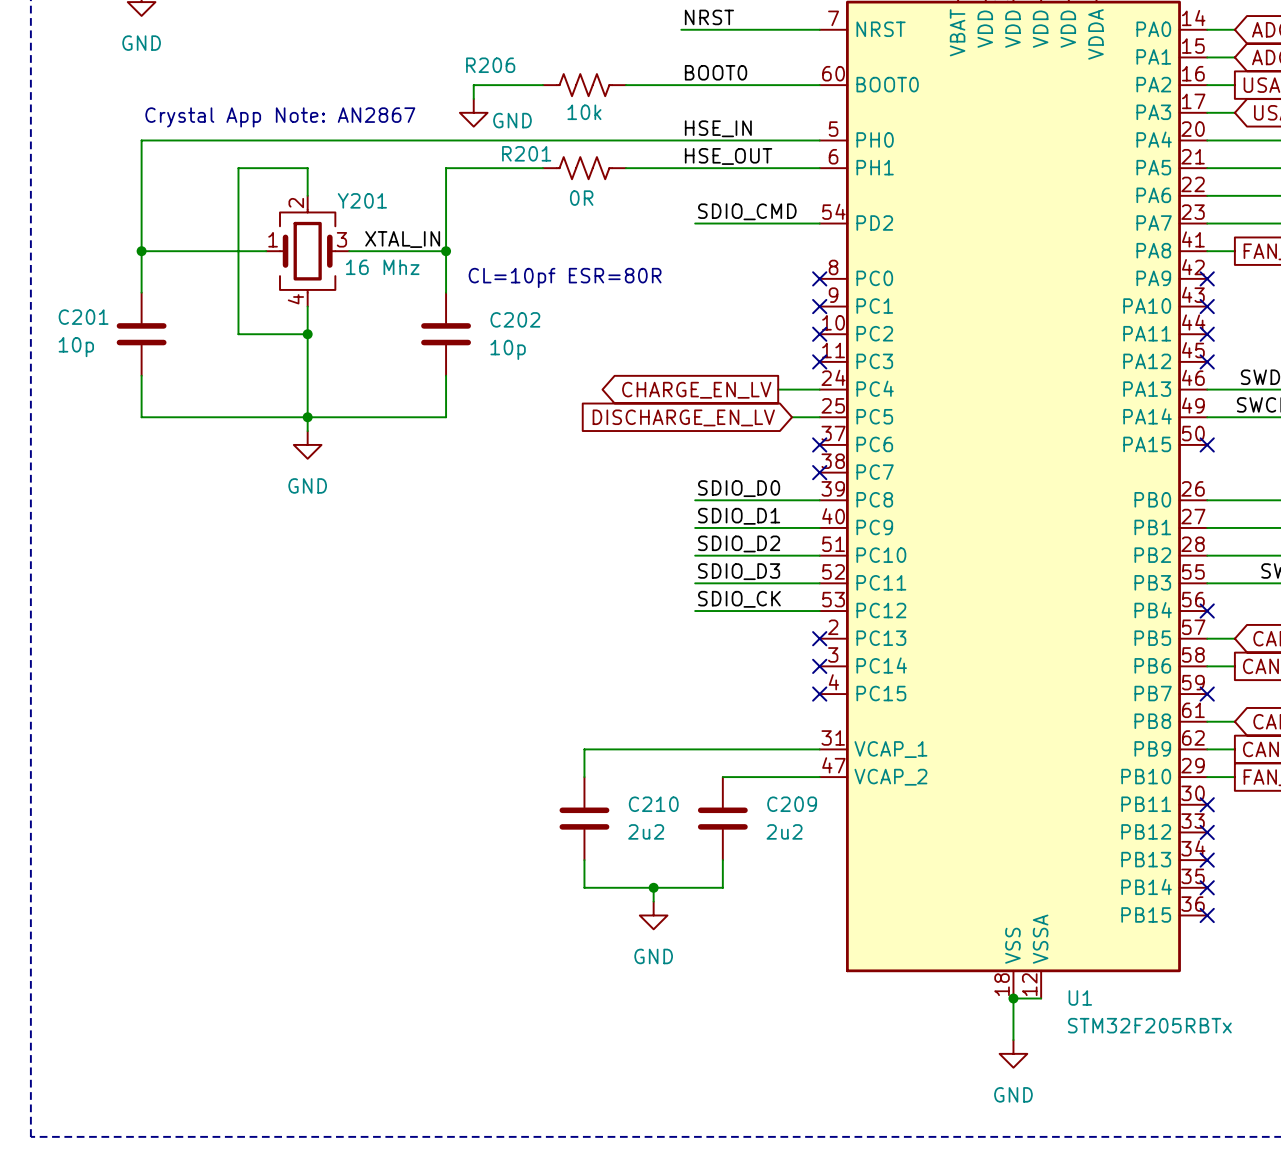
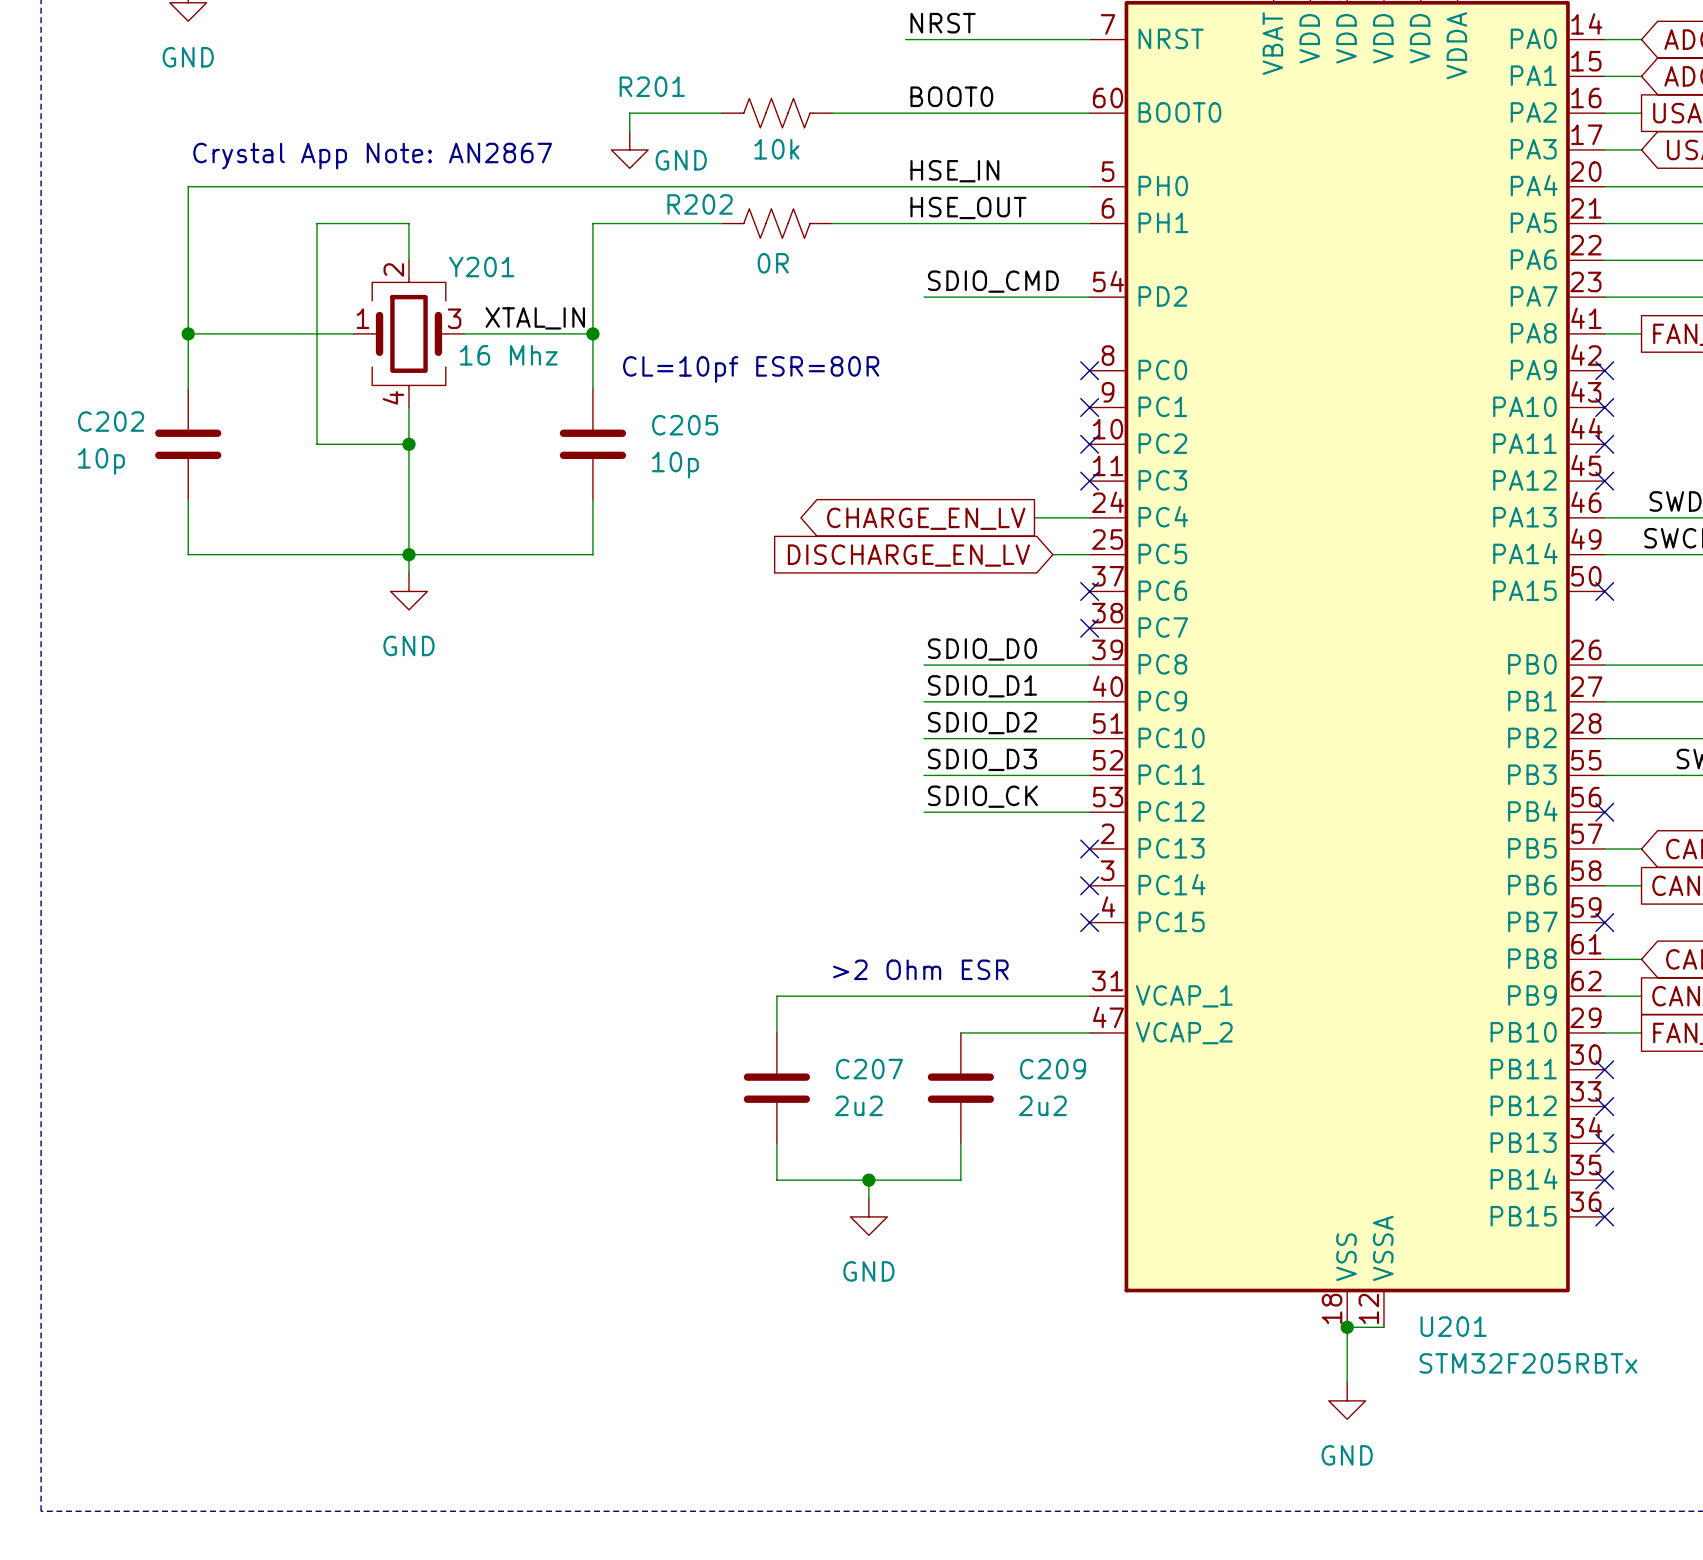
R206 name: R206 (490, 65) -> R201 (652, 86)
R201 name: R201 (526, 153) -> R202 (700, 204)
C201 name: C201 (83, 317) -> C202 (111, 421)
C202 name: C202 (515, 319) -> C205 (685, 425)
text: none -> >2 Ohm ESR (920, 969)
C210 name: C210 (653, 804) -> C207 (869, 1069)
U1 name: U1 (1080, 997) -> U201 (1453, 1326)

